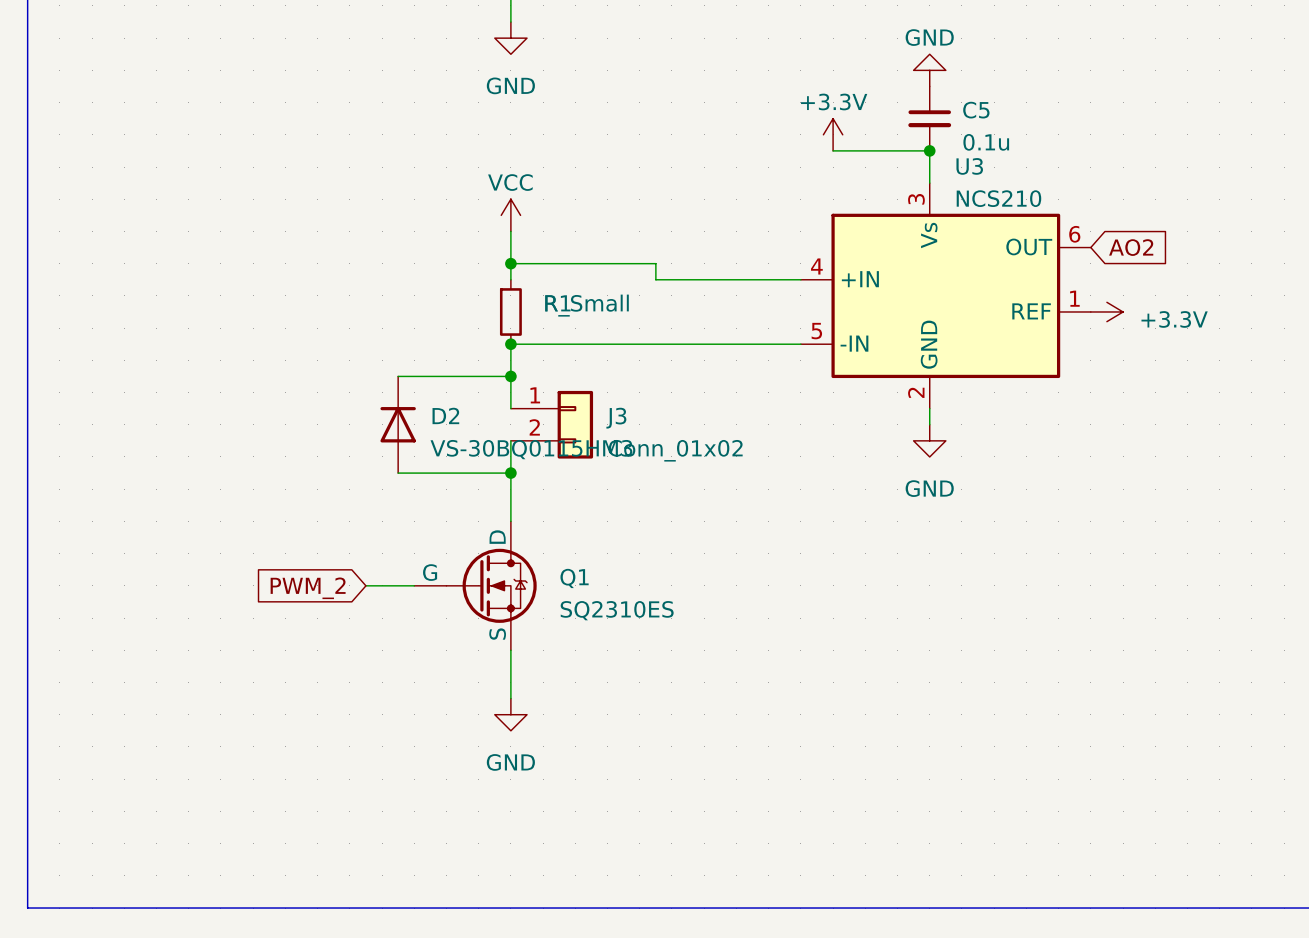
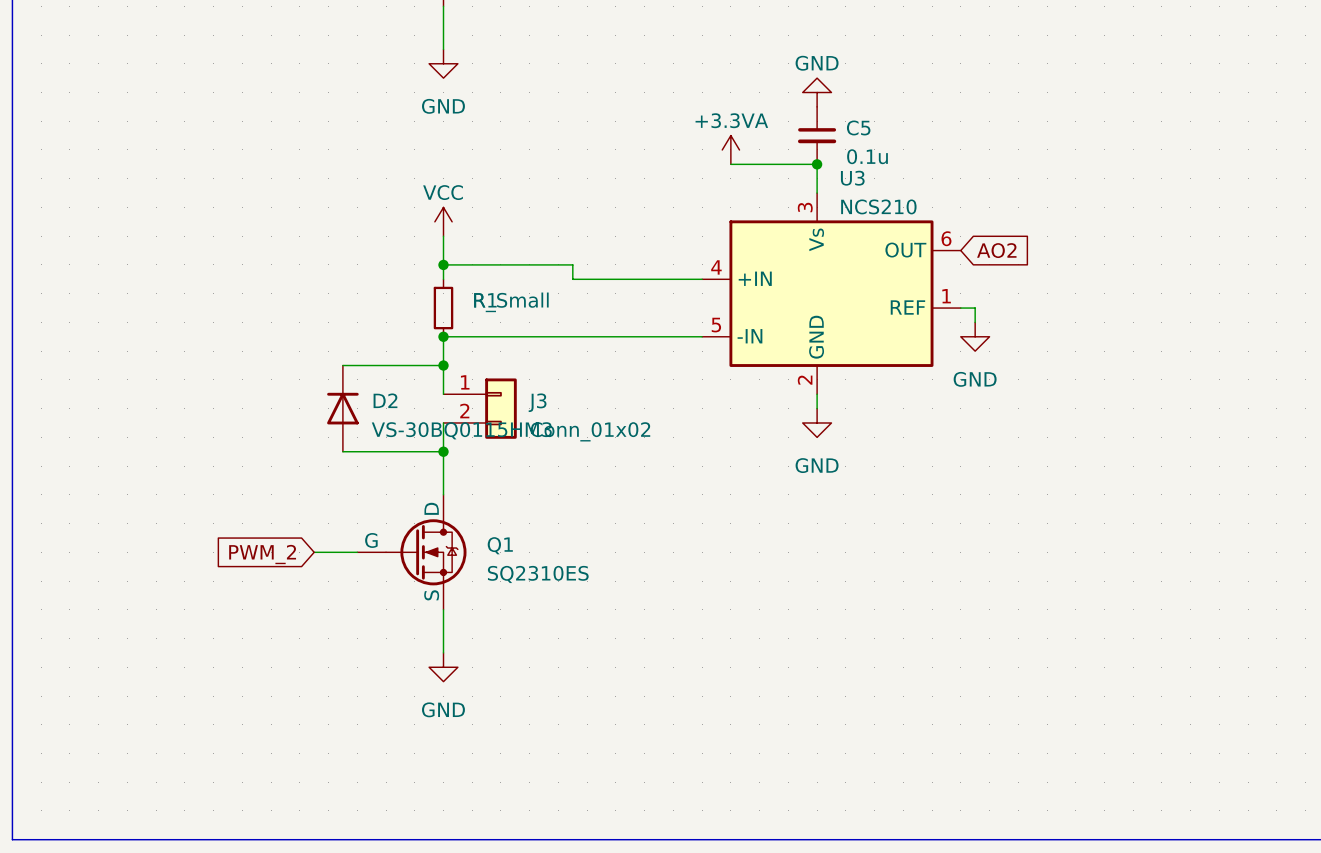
power symbol: +3.3V (833, 134) -> +3.3VA (730, 149)
power symbol: +3.3V (1106, 311) -> none
power symbol: none -> GND (975, 336)

